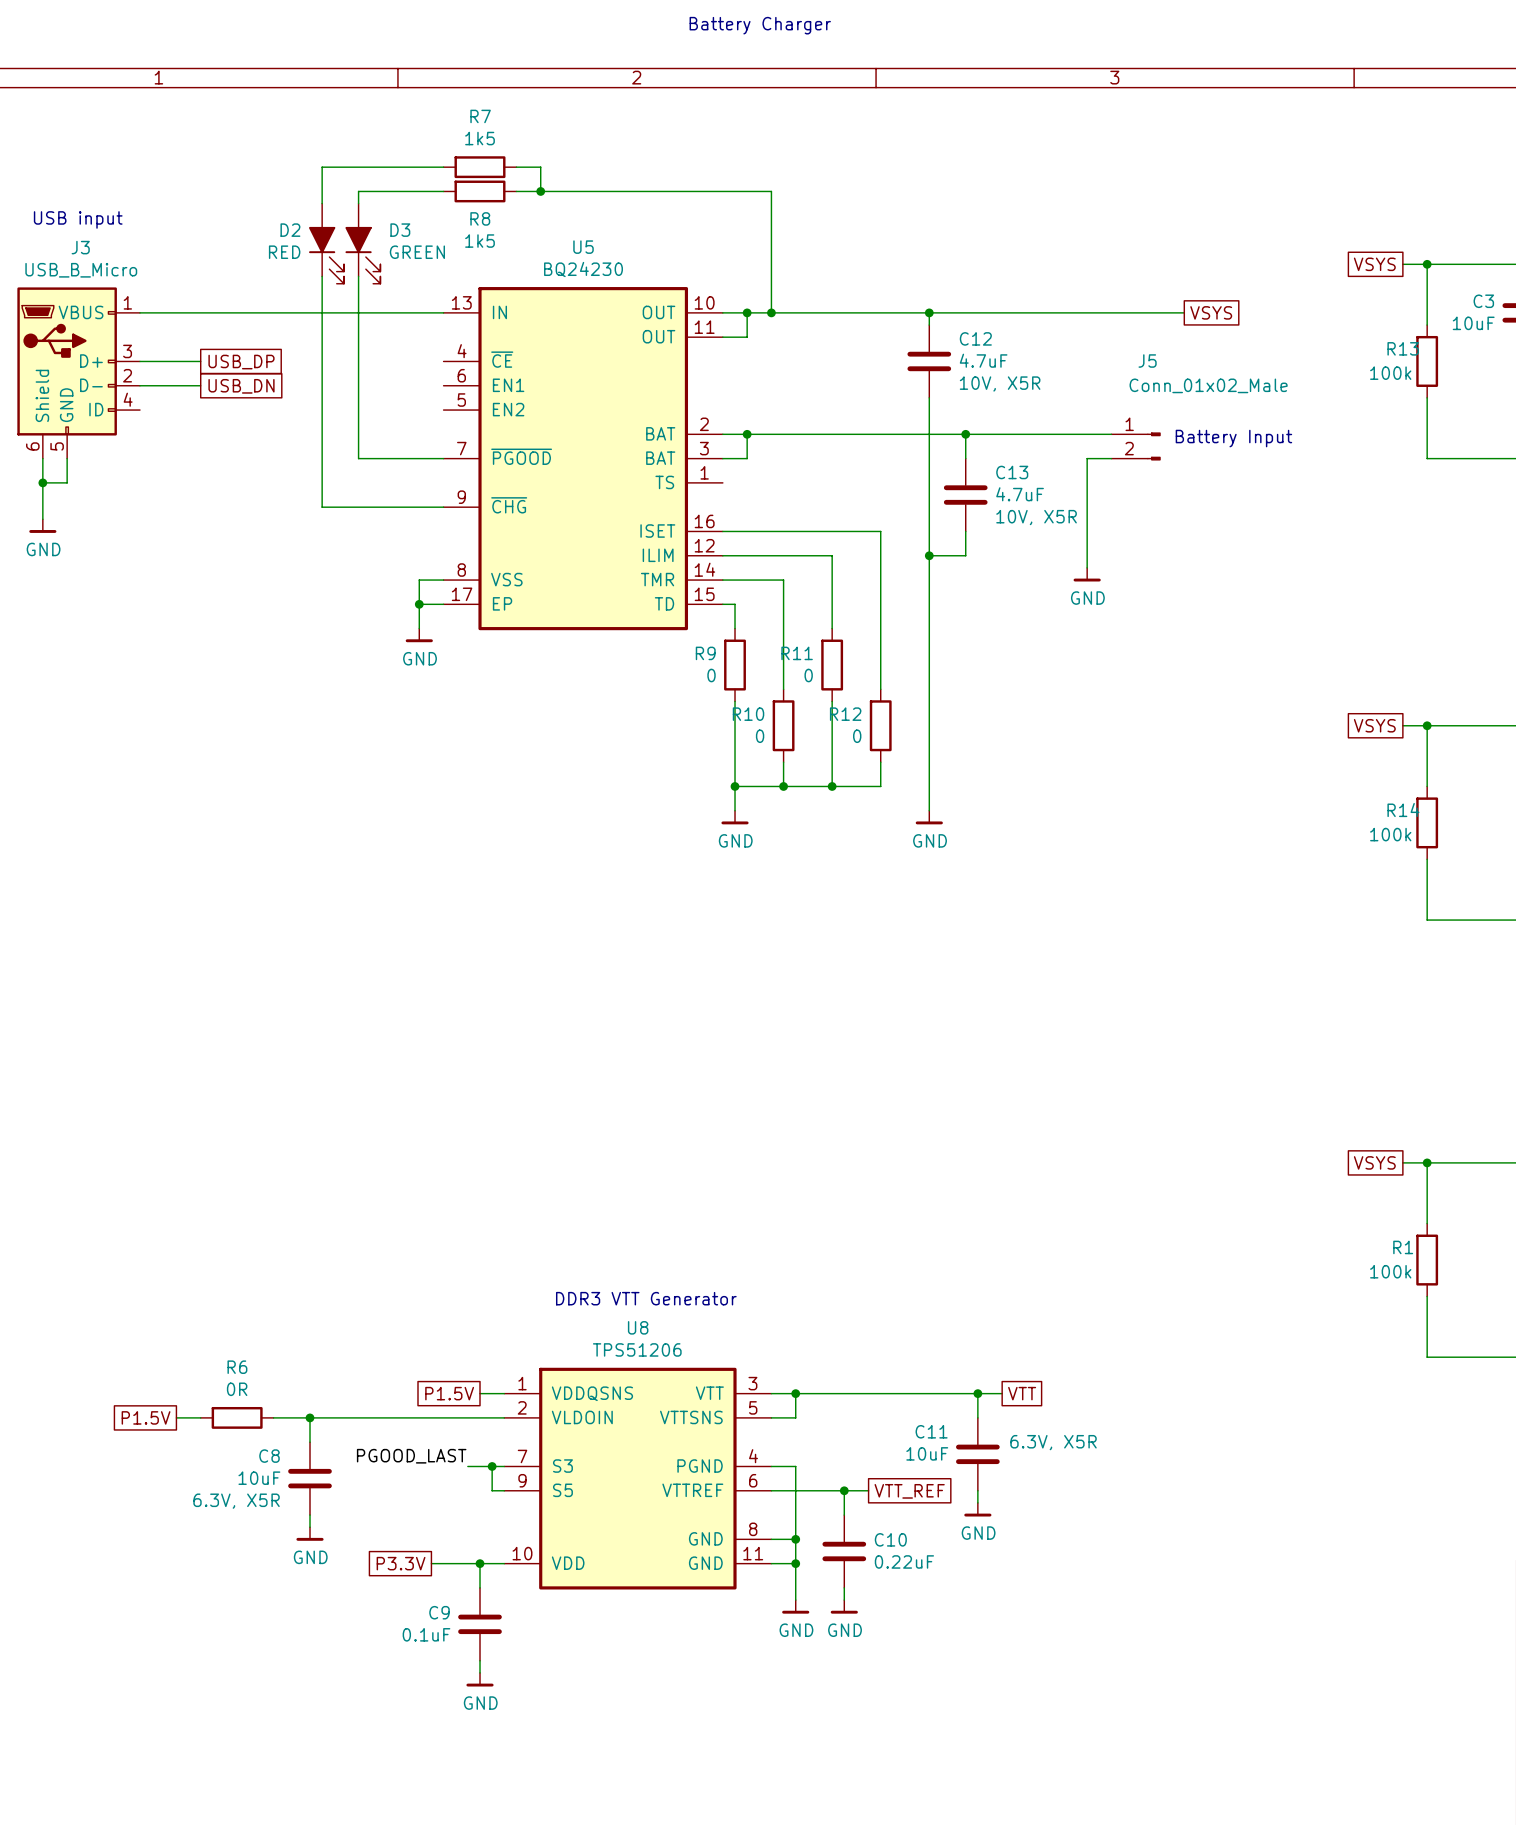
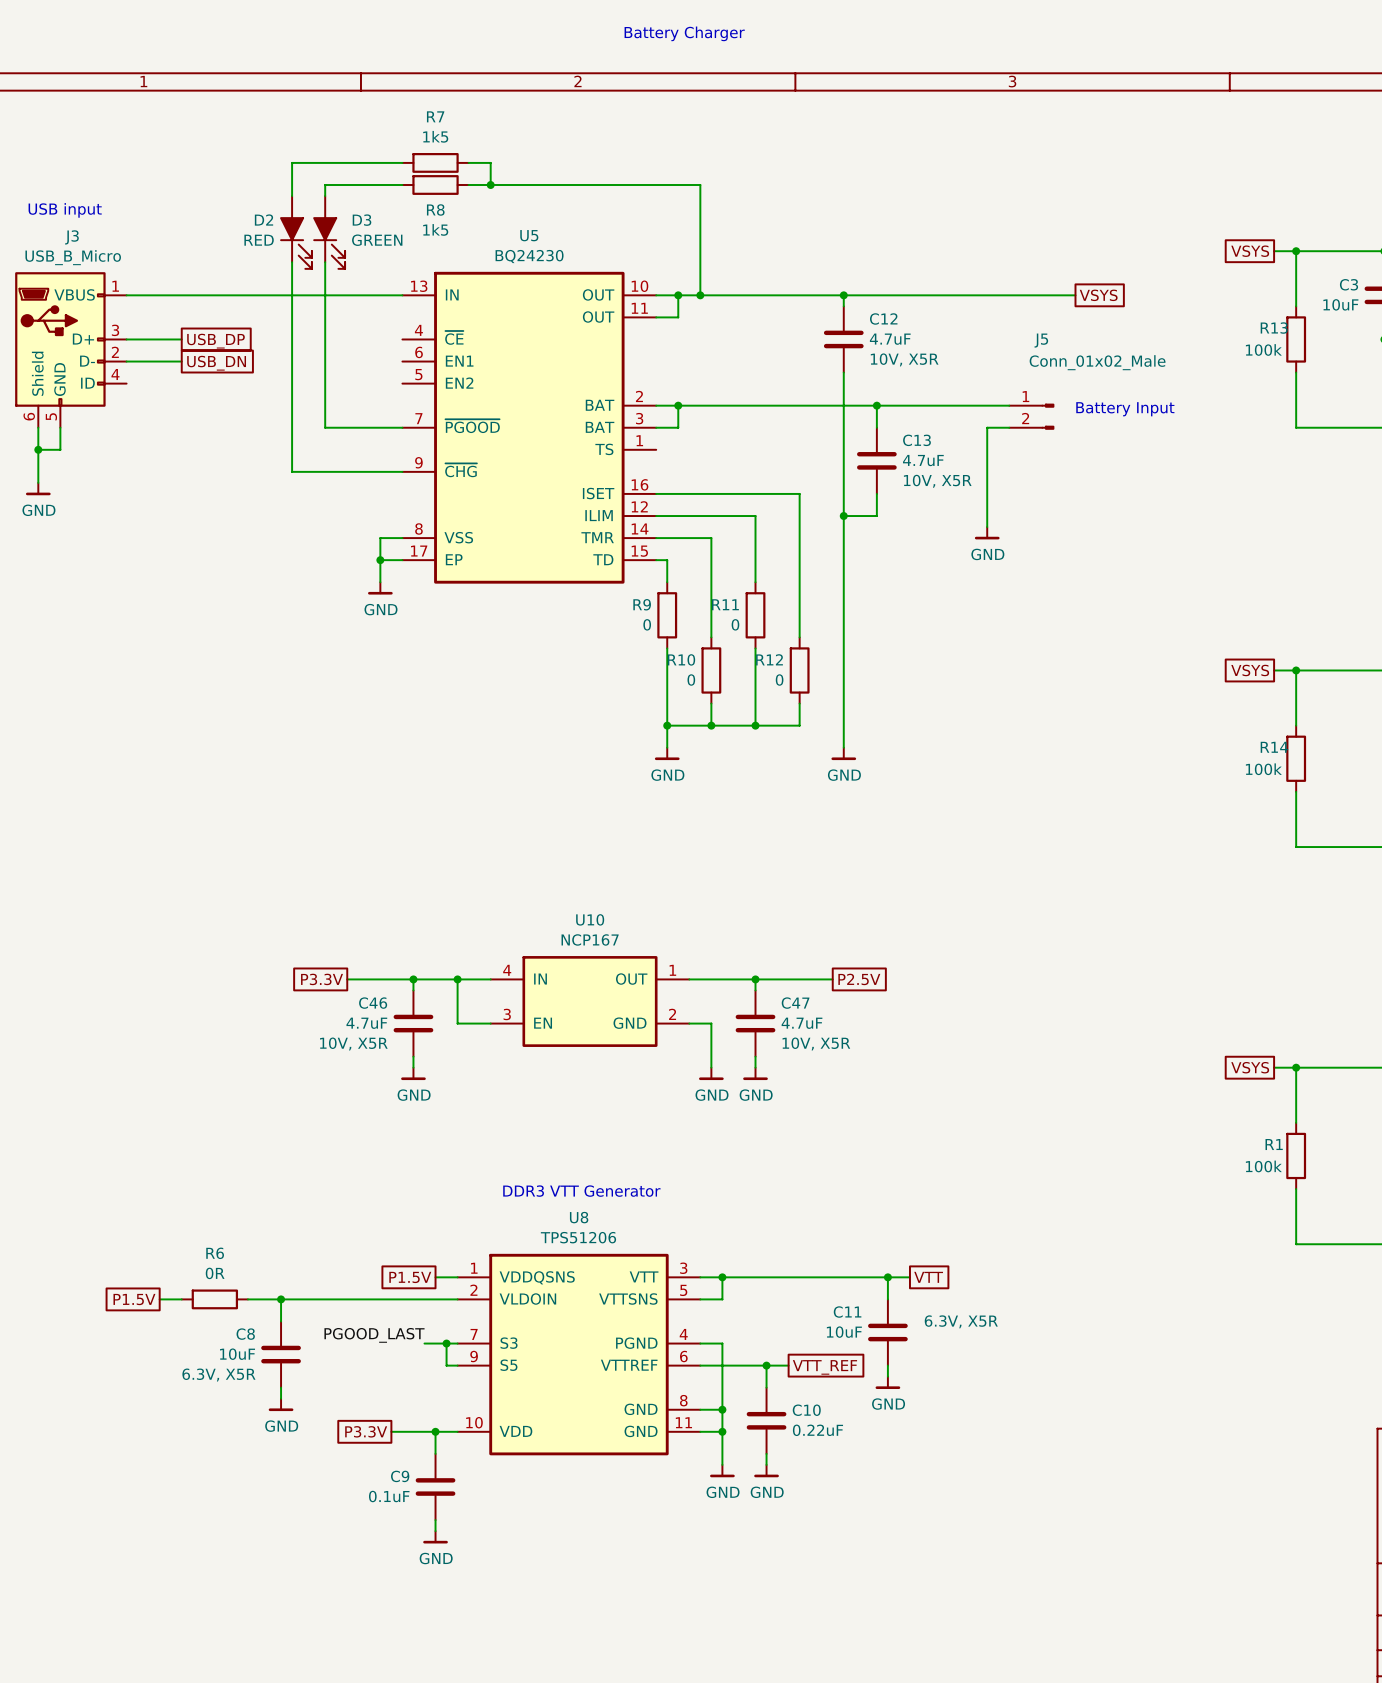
global label: none -> P3.3V (322, 979)
wire: none -> (347, 979) (490, 979)
wire: none -> (413, 979) (413, 990)
junction: none -> (413, 979)
wire: none -> (457, 979) (457, 1023) (490, 1023)
junction: none -> (457, 979)
wire: none -> (689, 979) (832, 979)
wire: none -> (755, 979) (755, 990)
junction: none -> (755, 979)
global label: none -> P2.5V (859, 979)
U10: none -> NCP167 (590, 1001)
C46: none -> 4.7uF (413, 1023)
wire: none -> (689, 1023) (711, 1023) (711, 1067)
C47: none -> 4.7uF (755, 1023)
wire: none -> (413, 1056) (413, 1067)
wire: none -> (755, 1056) (755, 1067)
power symbol: none -> GND (413, 1073)
power symbol: none -> GND (711, 1073)
power symbol: none -> GND (755, 1073)

